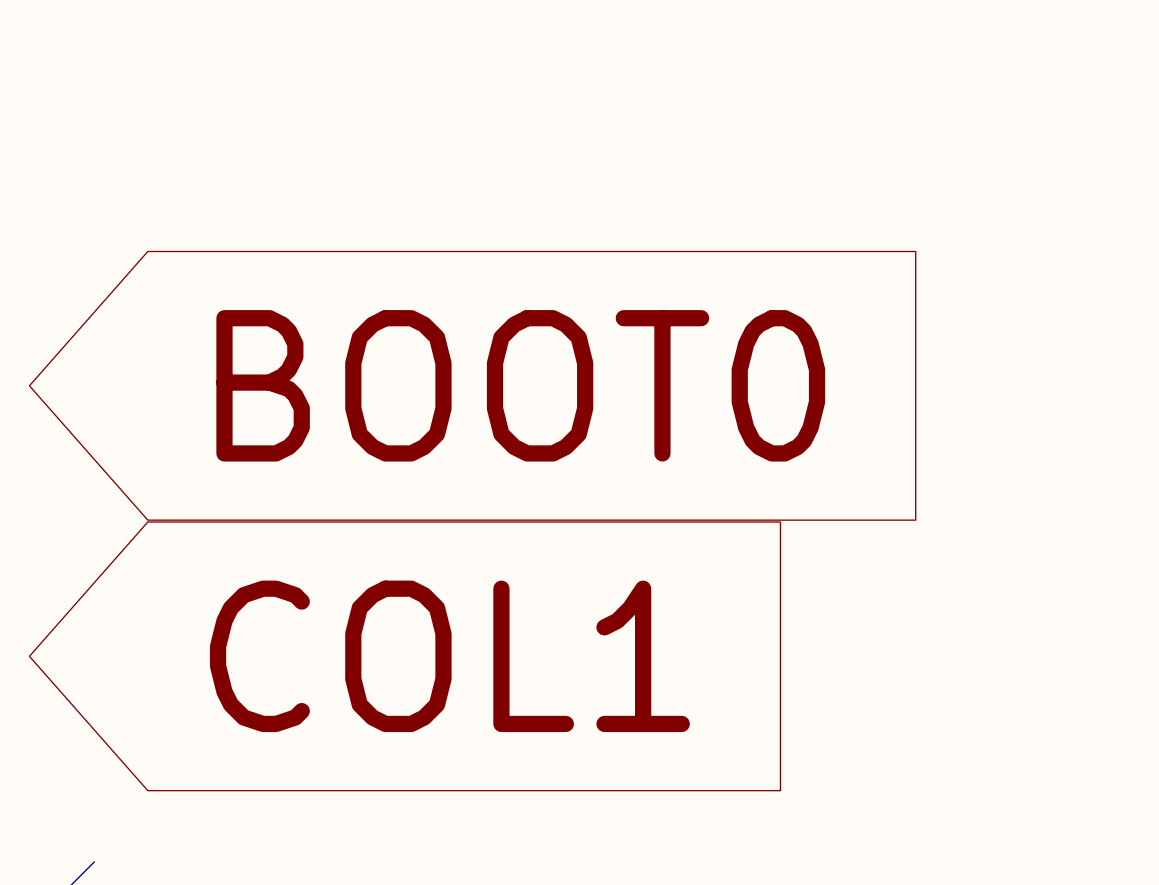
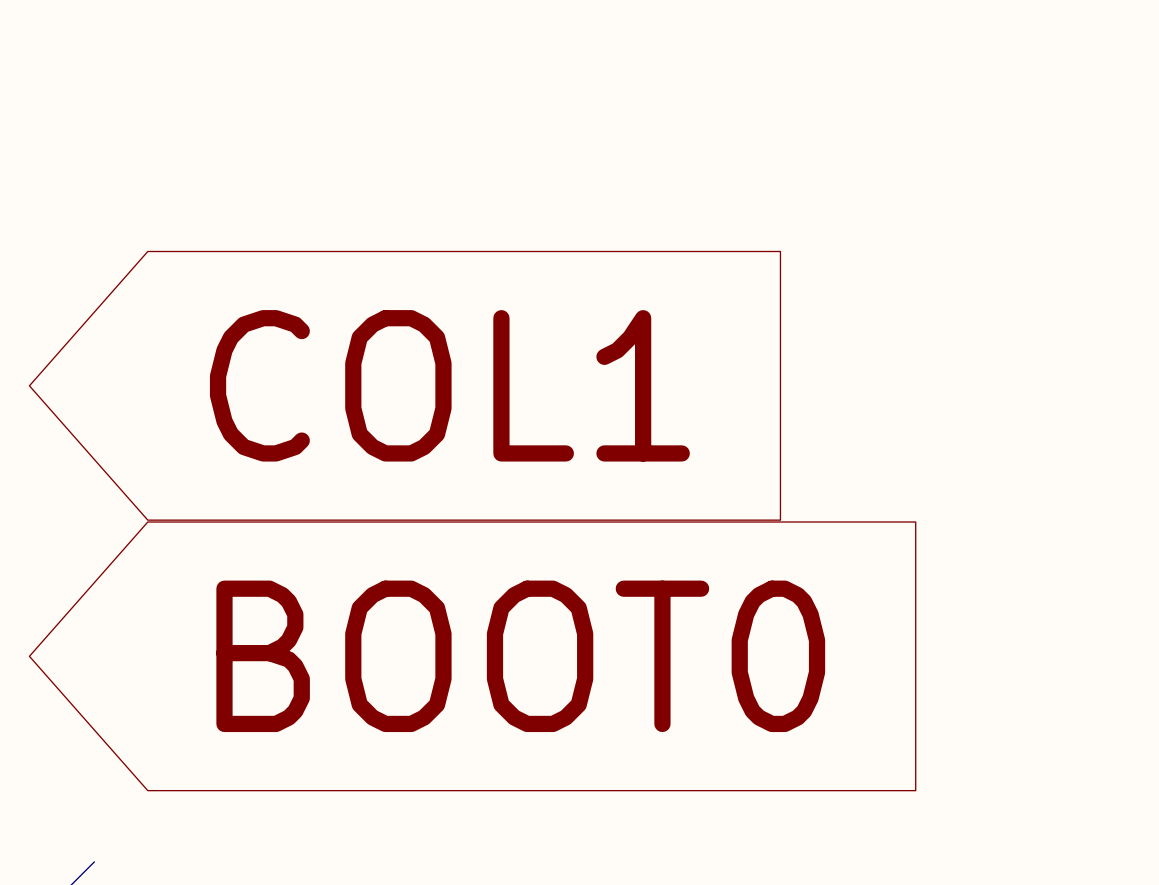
global label: BOOT0 (520, 385) -> COL1 (449, 385)
global label: COL1 (449, 656) -> BOOT0 (520, 656)

